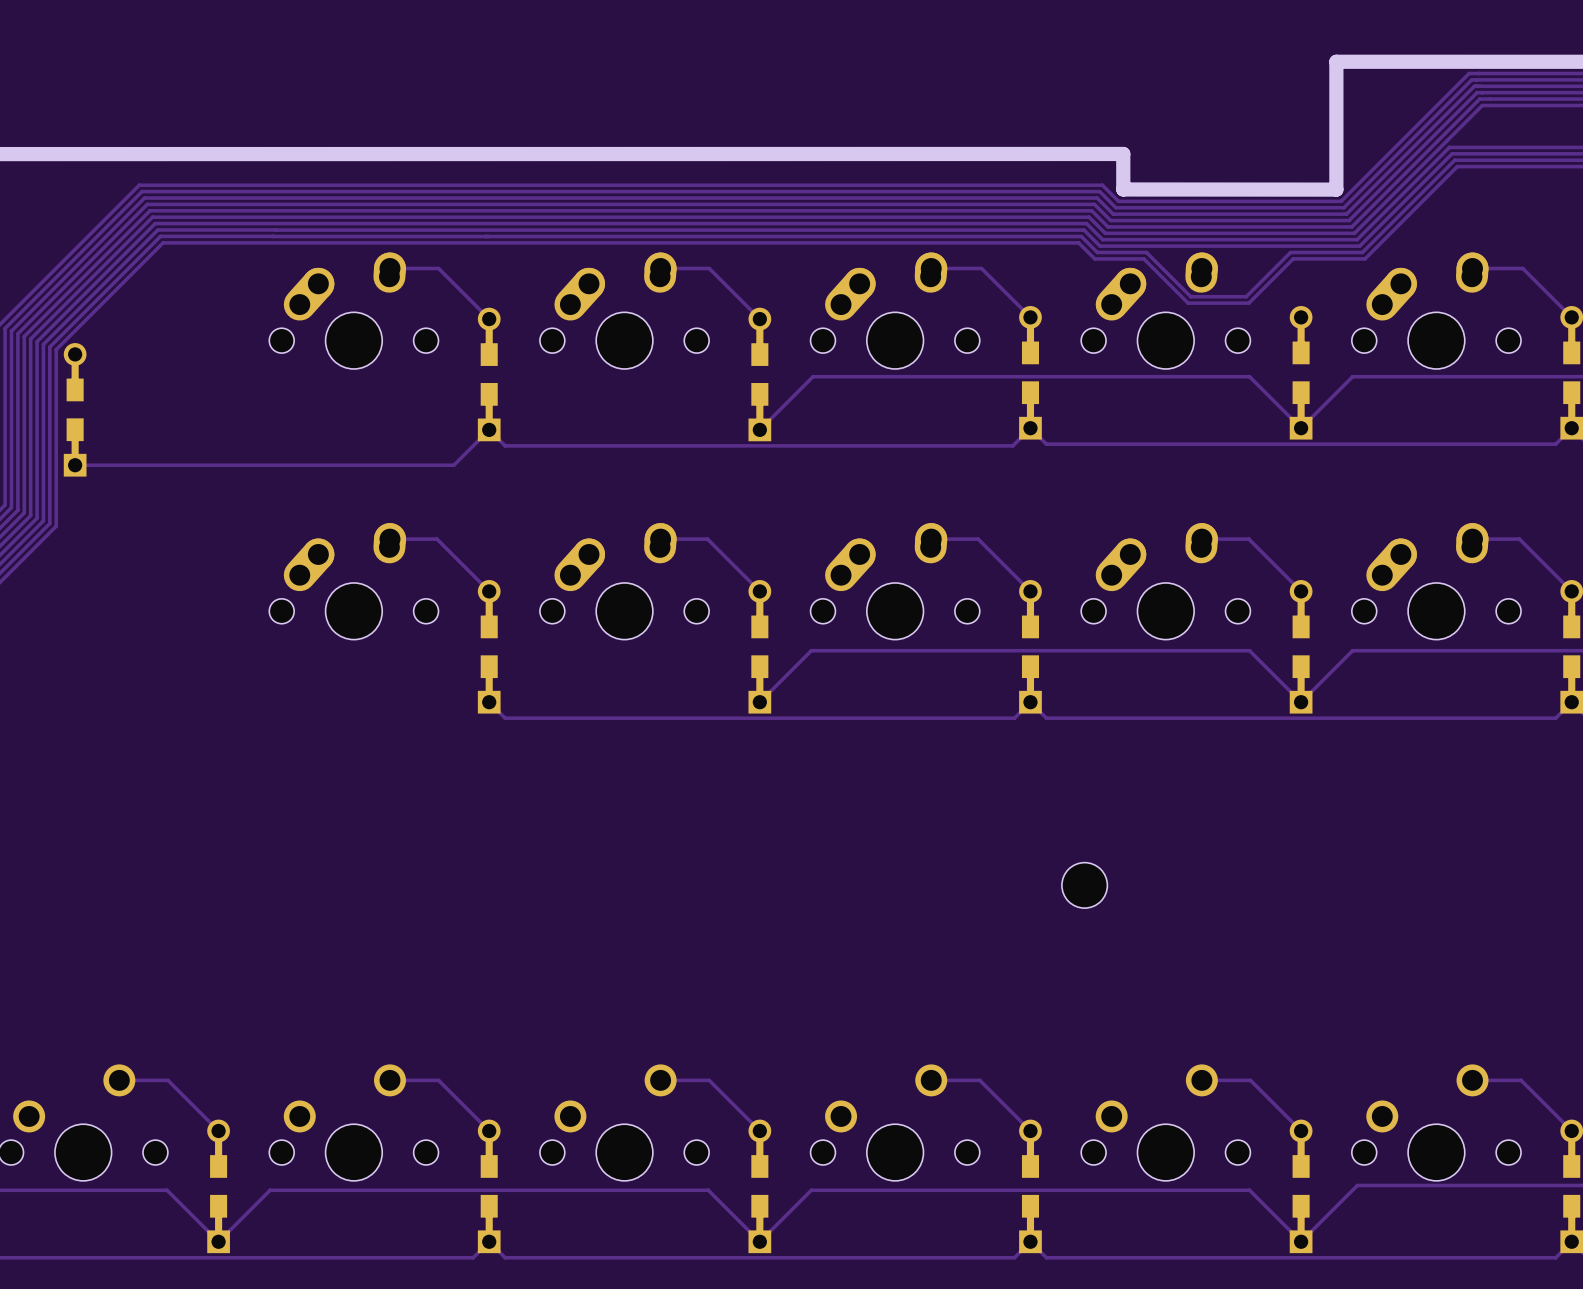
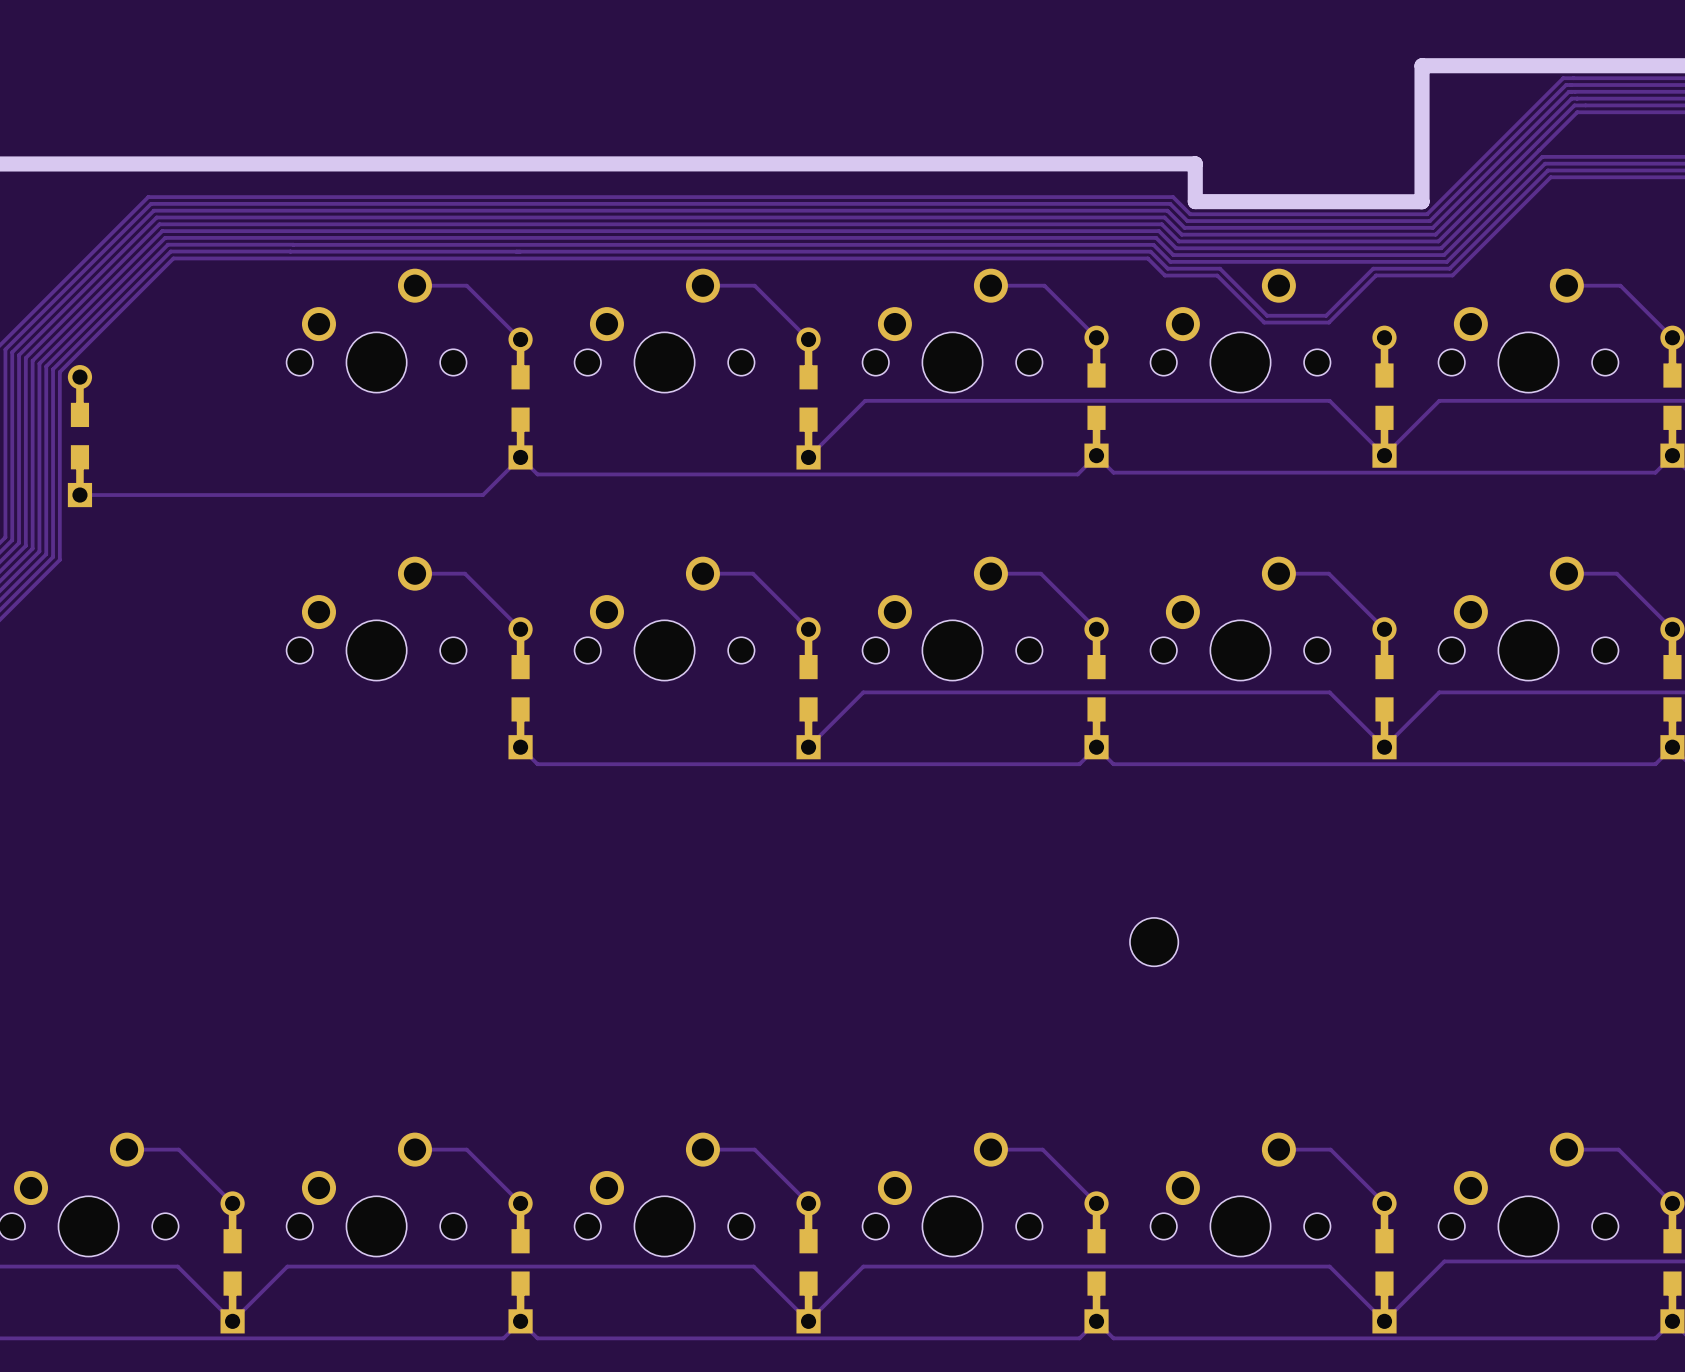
part footprint: [269, 252, 439, 369] -> [286, 268, 467, 393]
part footprint: [539, 252, 710, 369] -> [574, 268, 755, 393]
part footprint: [810, 252, 980, 369] -> [862, 268, 1043, 393]
part footprint: [1081, 252, 1251, 369] -> [1150, 268, 1331, 393]
part footprint: [1351, 252, 1522, 369] -> [1438, 268, 1619, 393]
part footprint: [269, 523, 439, 640] -> [286, 556, 467, 681]
part footprint: [539, 523, 710, 640] -> [574, 556, 755, 681]
part footprint: [810, 523, 980, 640] -> [862, 556, 1043, 681]
part footprint: [1081, 523, 1251, 640] -> [1150, 556, 1331, 681]
part footprint: [1351, 523, 1522, 640] -> [1438, 556, 1619, 681]

